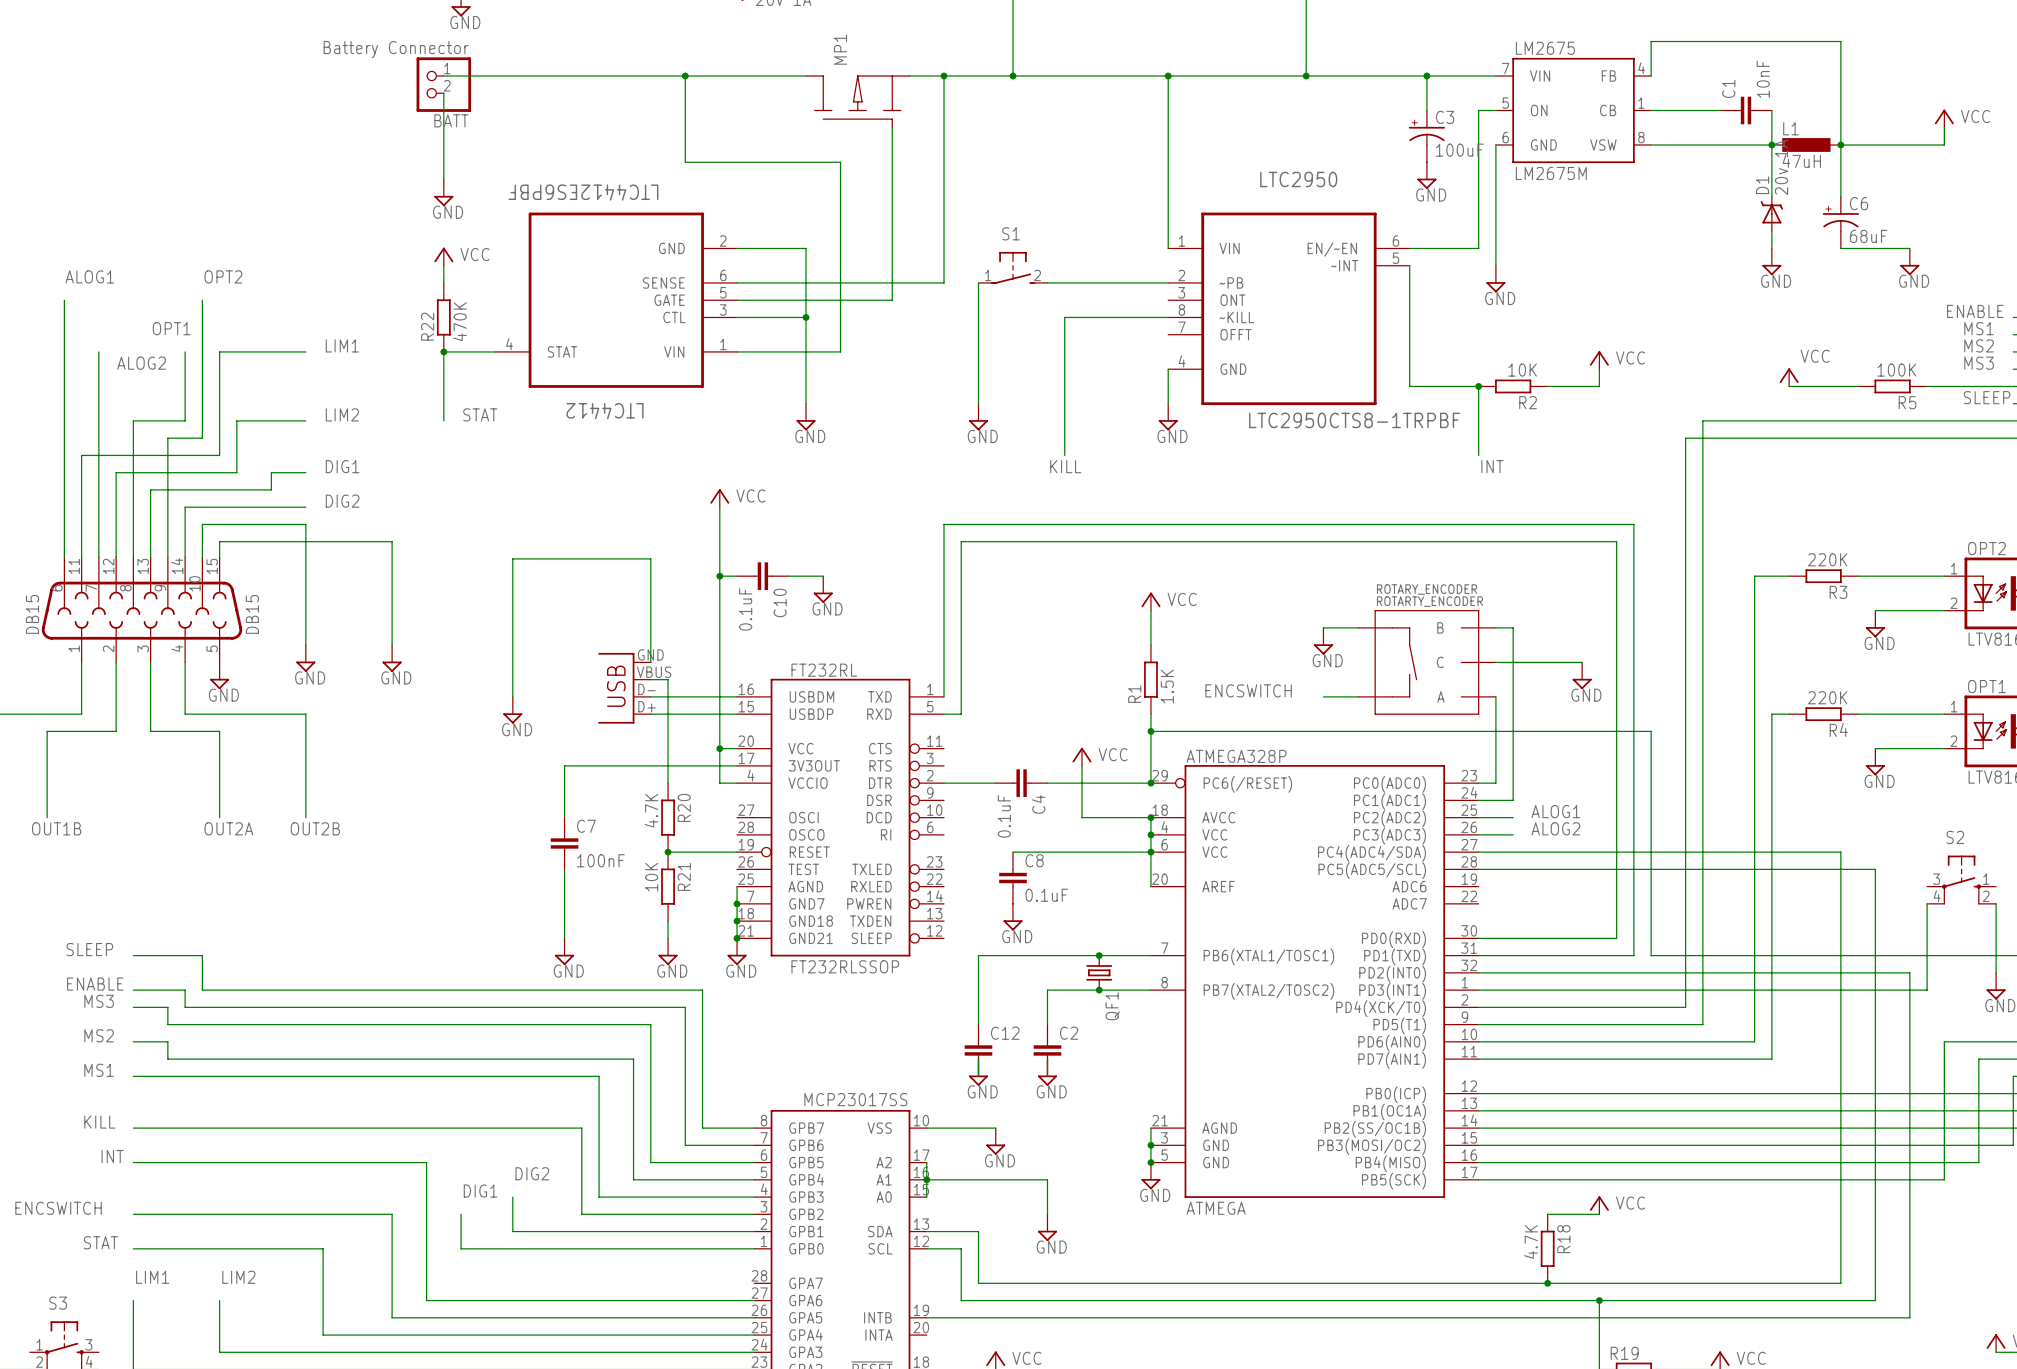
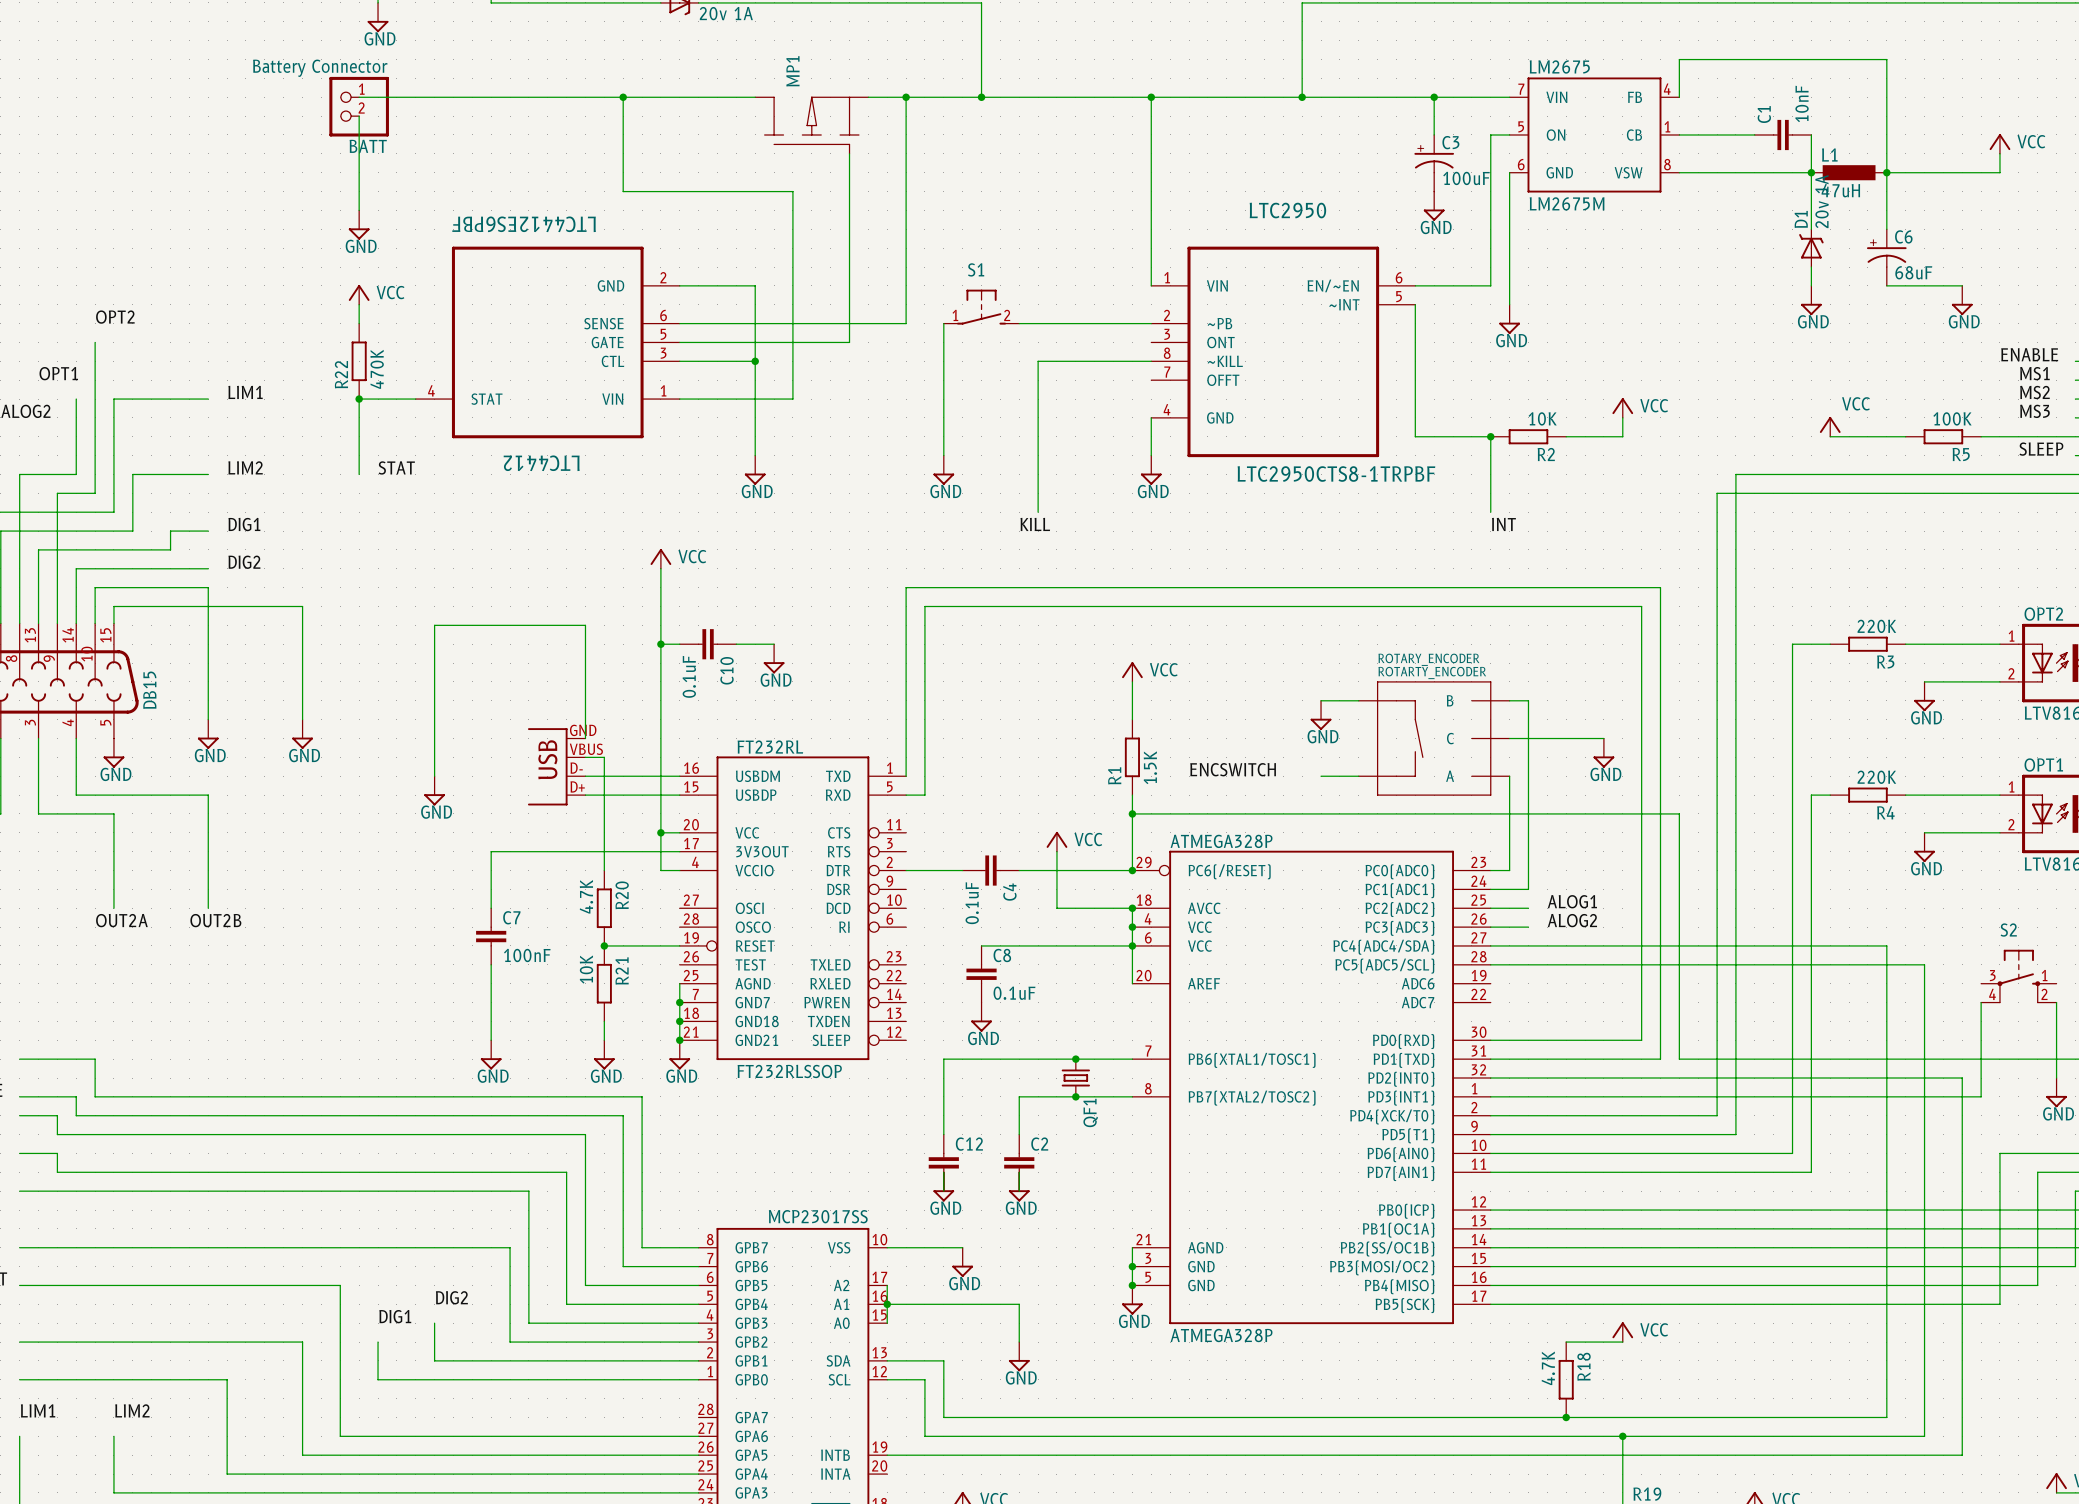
ATMEGA name: ATMEGA (1216, 1208) -> ATMEGA328P (1221, 1335)

